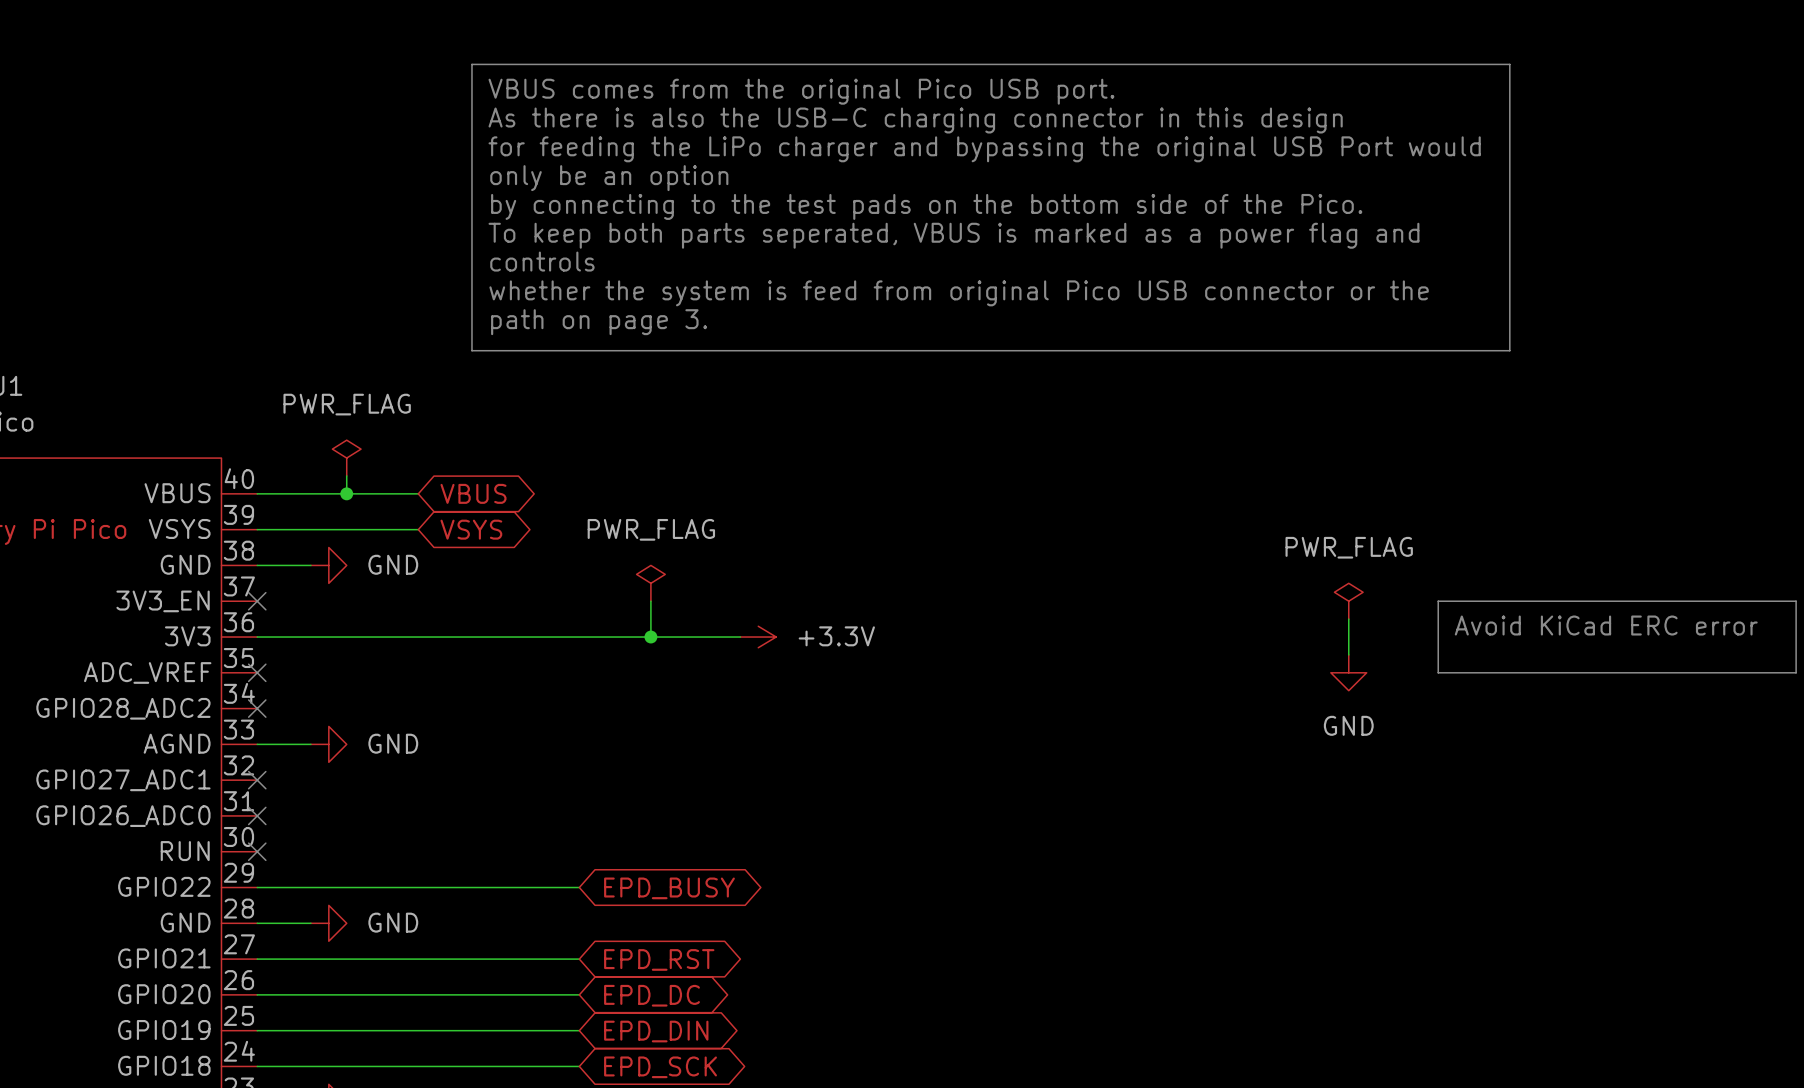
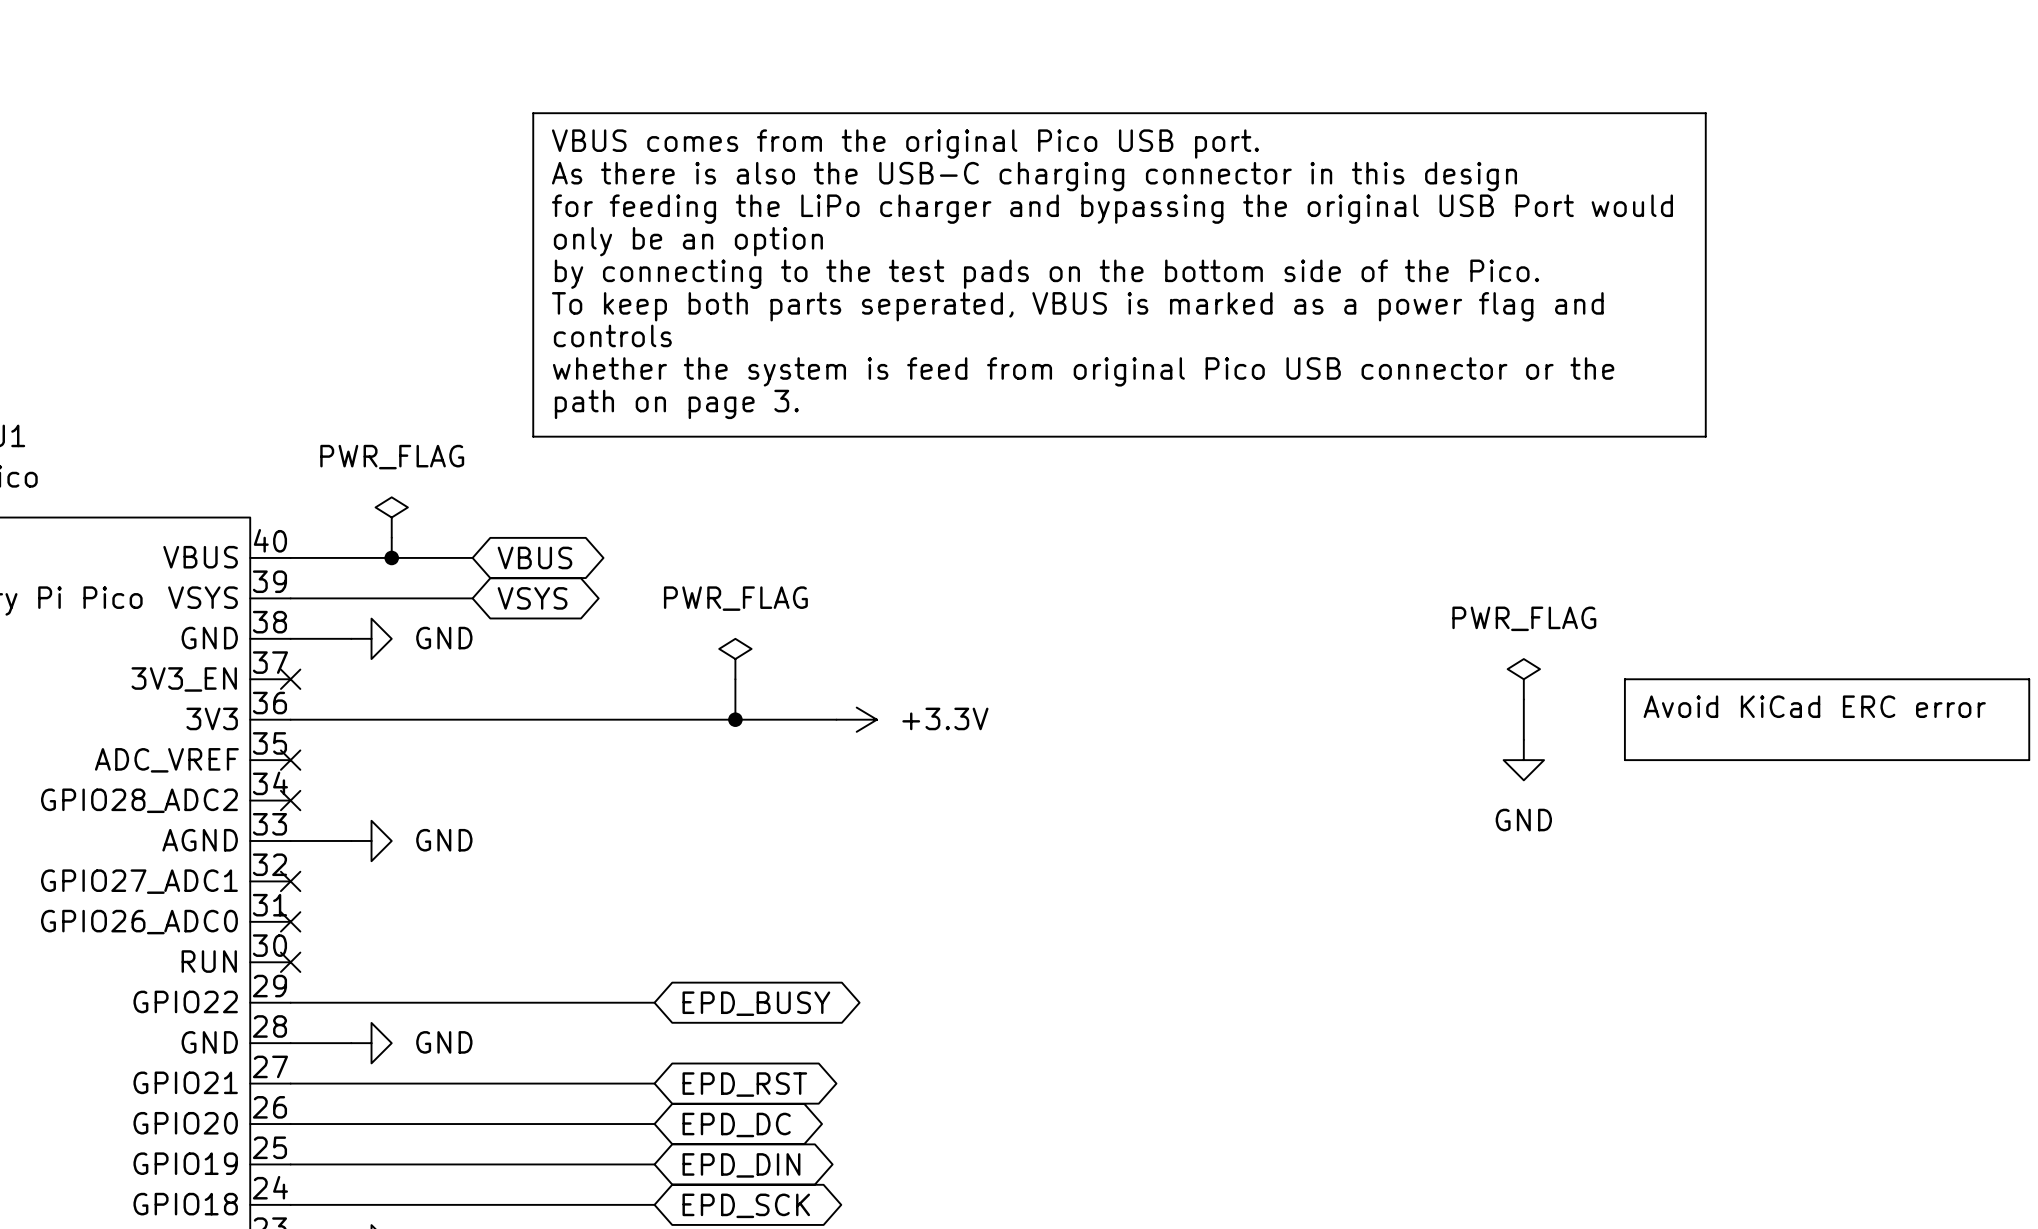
text position: VBUS comes from the original Pico USB port. (801, 91) -> VBUS comes from the original Pico USB port. (905, 144)
line: (471, 100) (471, 64) (1509, 64) (1509, 100) -> (533, 113) (1705, 113)
text position: As there is also the USB-C charging connector in this design (915, 120) -> As there is also the USB-C charging connector in this design (1034, 176)
text position: for feeding the LiPo charger and bypassing the original USB Port would (984, 149) -> for feeding the LiPo charger and bypassing the original USB Port would (1112, 209)
text position: only be an option (609, 178) -> only be an option (688, 241)
text position: by connecting to the test pads on the bottom side of the Pico. (926, 206) -> by connecting to the test pads on the bottom side of the Pico. (1046, 274)
text position: To keep both parts seperated, VBUS is marked as a power flag and (953, 235) -> To keep both parts seperated, VBUS is marked as a power flag and (1077, 306)
text position: controls (542, 261) -> controls (612, 335)
text position: whether the system is feed from original Pico USB connector or the (959, 293) -> whether the system is feed from original Pico USB connector or the (1083, 371)
text position: path on page 3. (599, 322) -> path on page 3. (676, 404)
line: (471, 350) (1509, 350) -> (533, 396) (533, 436) (1705, 436) (1705, 396)

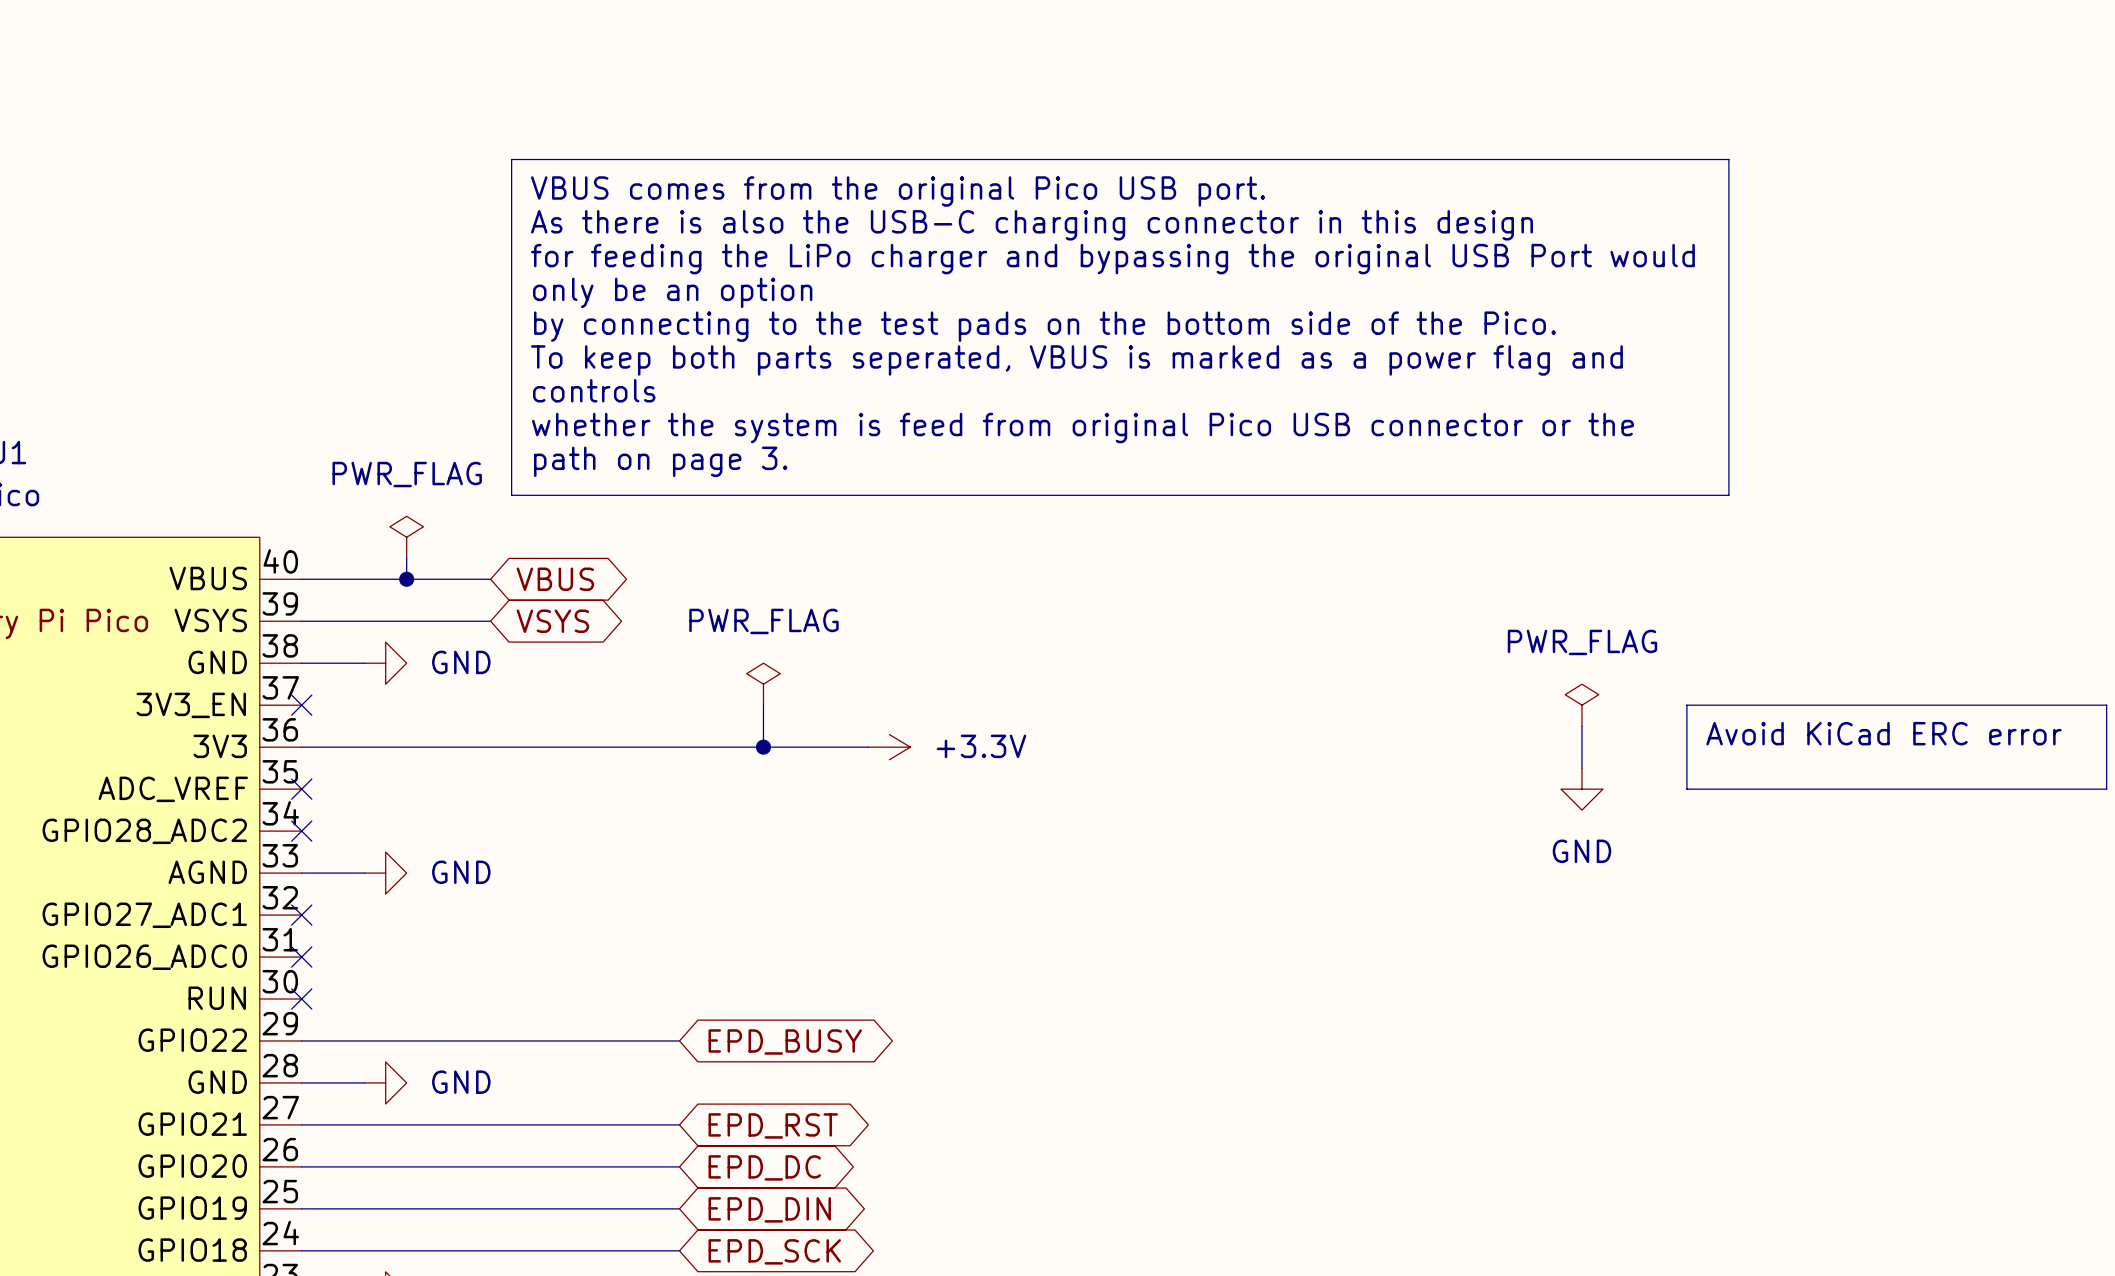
line: (533, 113) (1705, 113) (1705, 436) (533, 436) (533, 113) -> (511, 159) (1728, 159) (1728, 495) (511, 495) (511, 159)
text position: VBUS comes from the original Pico USB port. (905, 144) -> VBUS comes from the original Pico USB port. (898, 191)
text position: As there is also the USB-C charging connector in this design (1034, 176) -> As there is also the USB-C charging connector in this design (1031, 225)
text position: for feeding the LiPo charger and bypassing the original USB Port would (1112, 209) -> for feeding the LiPo charger and bypassing the original USB Port would (1112, 259)
text position: only be an option (688, 241) -> only be an option (672, 292)
text position: by connecting to the test pads on the bottom side of the Pico. (1046, 274) -> by connecting to the test pads on the bottom side of the Pico. (1044, 326)
text position: To keep both parts seperated, VBUS is marked as a power flag and (1077, 306) -> To keep both parts seperated, VBUS is marked as a power flag and (1076, 360)
text position: controls (612, 335) -> controls (594, 390)
text position: whether the system is feed from original Pico USB connector or the (1083, 371) -> whether the system is feed from original Pico USB connector or the (1082, 428)
text position: path on page 3. (676, 404) -> path on page 3. (660, 461)

